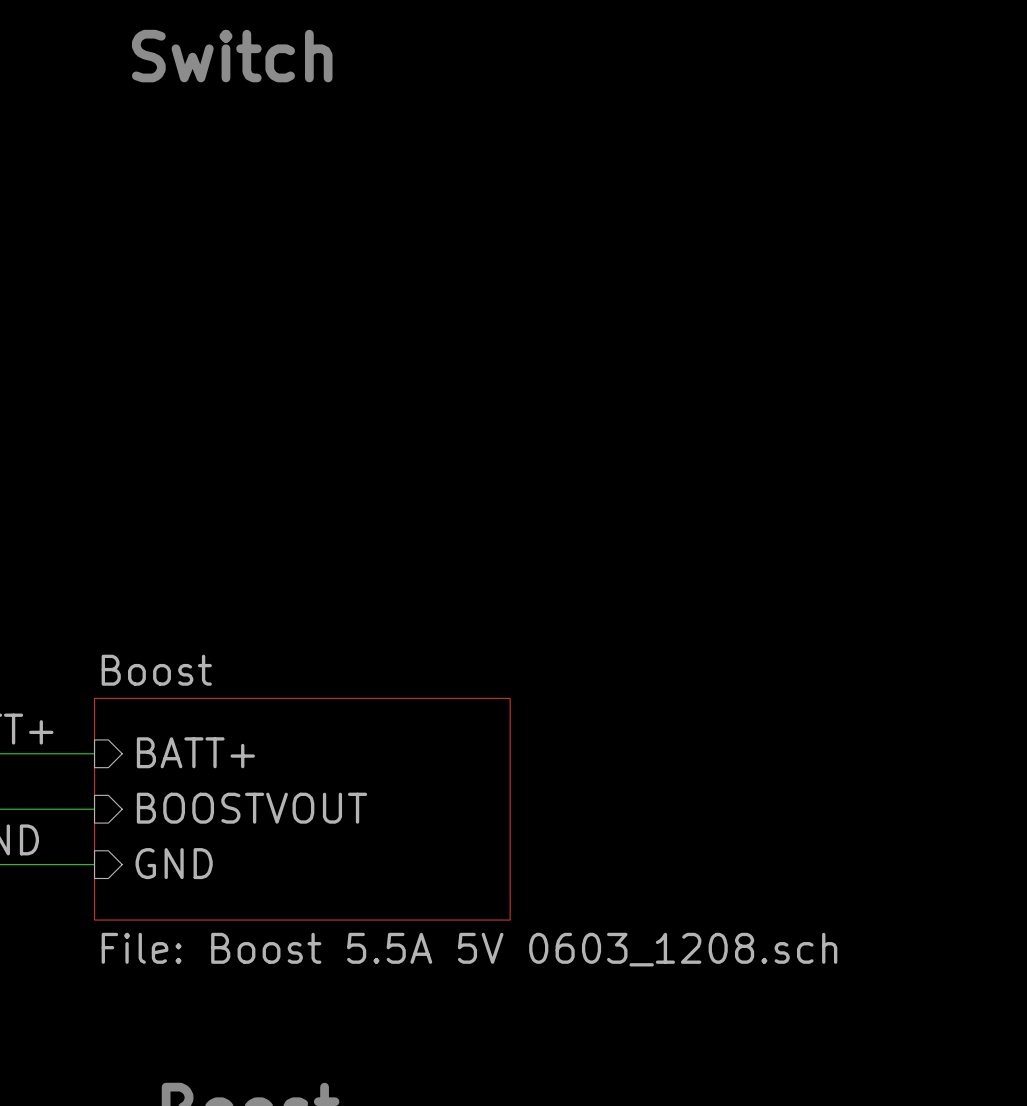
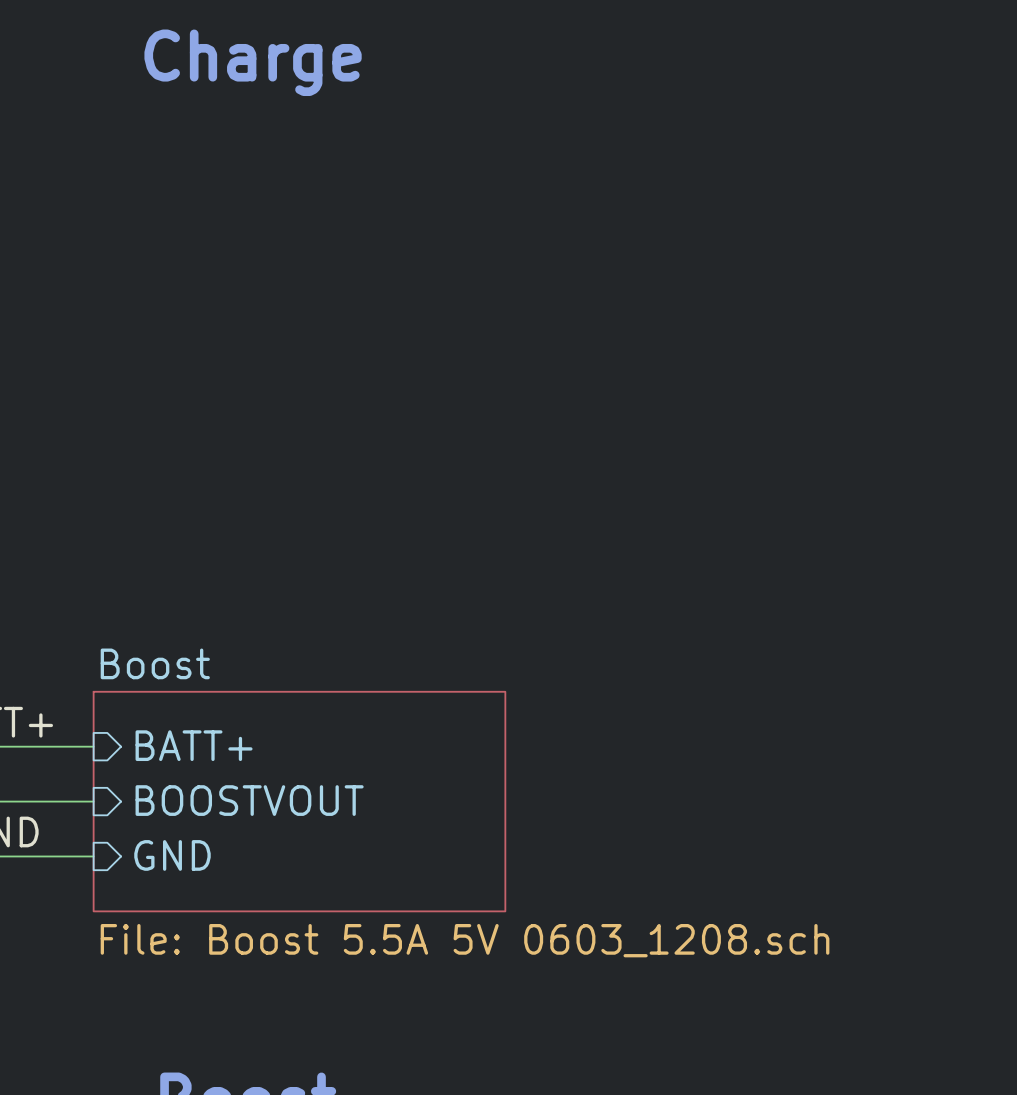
text: Switch (232, 56) -> Charge (253, 62)

